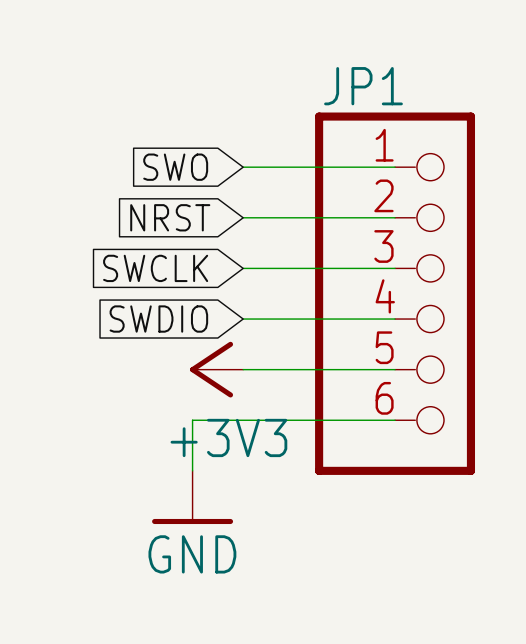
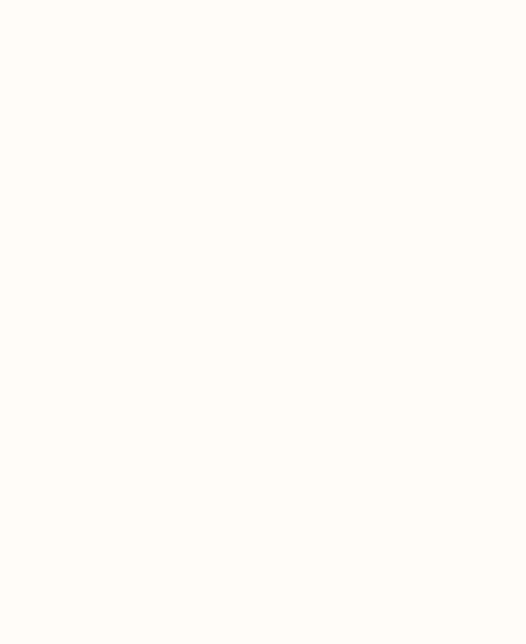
global label: SWO (175, 167) -> none
wire: (243, 167) (395, 167) -> none
global label: NRST (170, 217) -> none
wire: (243, 217) (395, 217) -> none
global label: SWCLK (155, 268) -> none
wire: (243, 268) (395, 268) -> none
JP1: (395, 293) -> none
global label: SWDIO (158, 319) -> none
wire: (243, 319) (395, 319) -> none
power symbol: +3V3 (216, 369) -> none
wire: (243, 369) (395, 369) -> none
wire: (395, 420) (192, 420) (192, 470) -> none
power symbol: GND (192, 497) -> none

